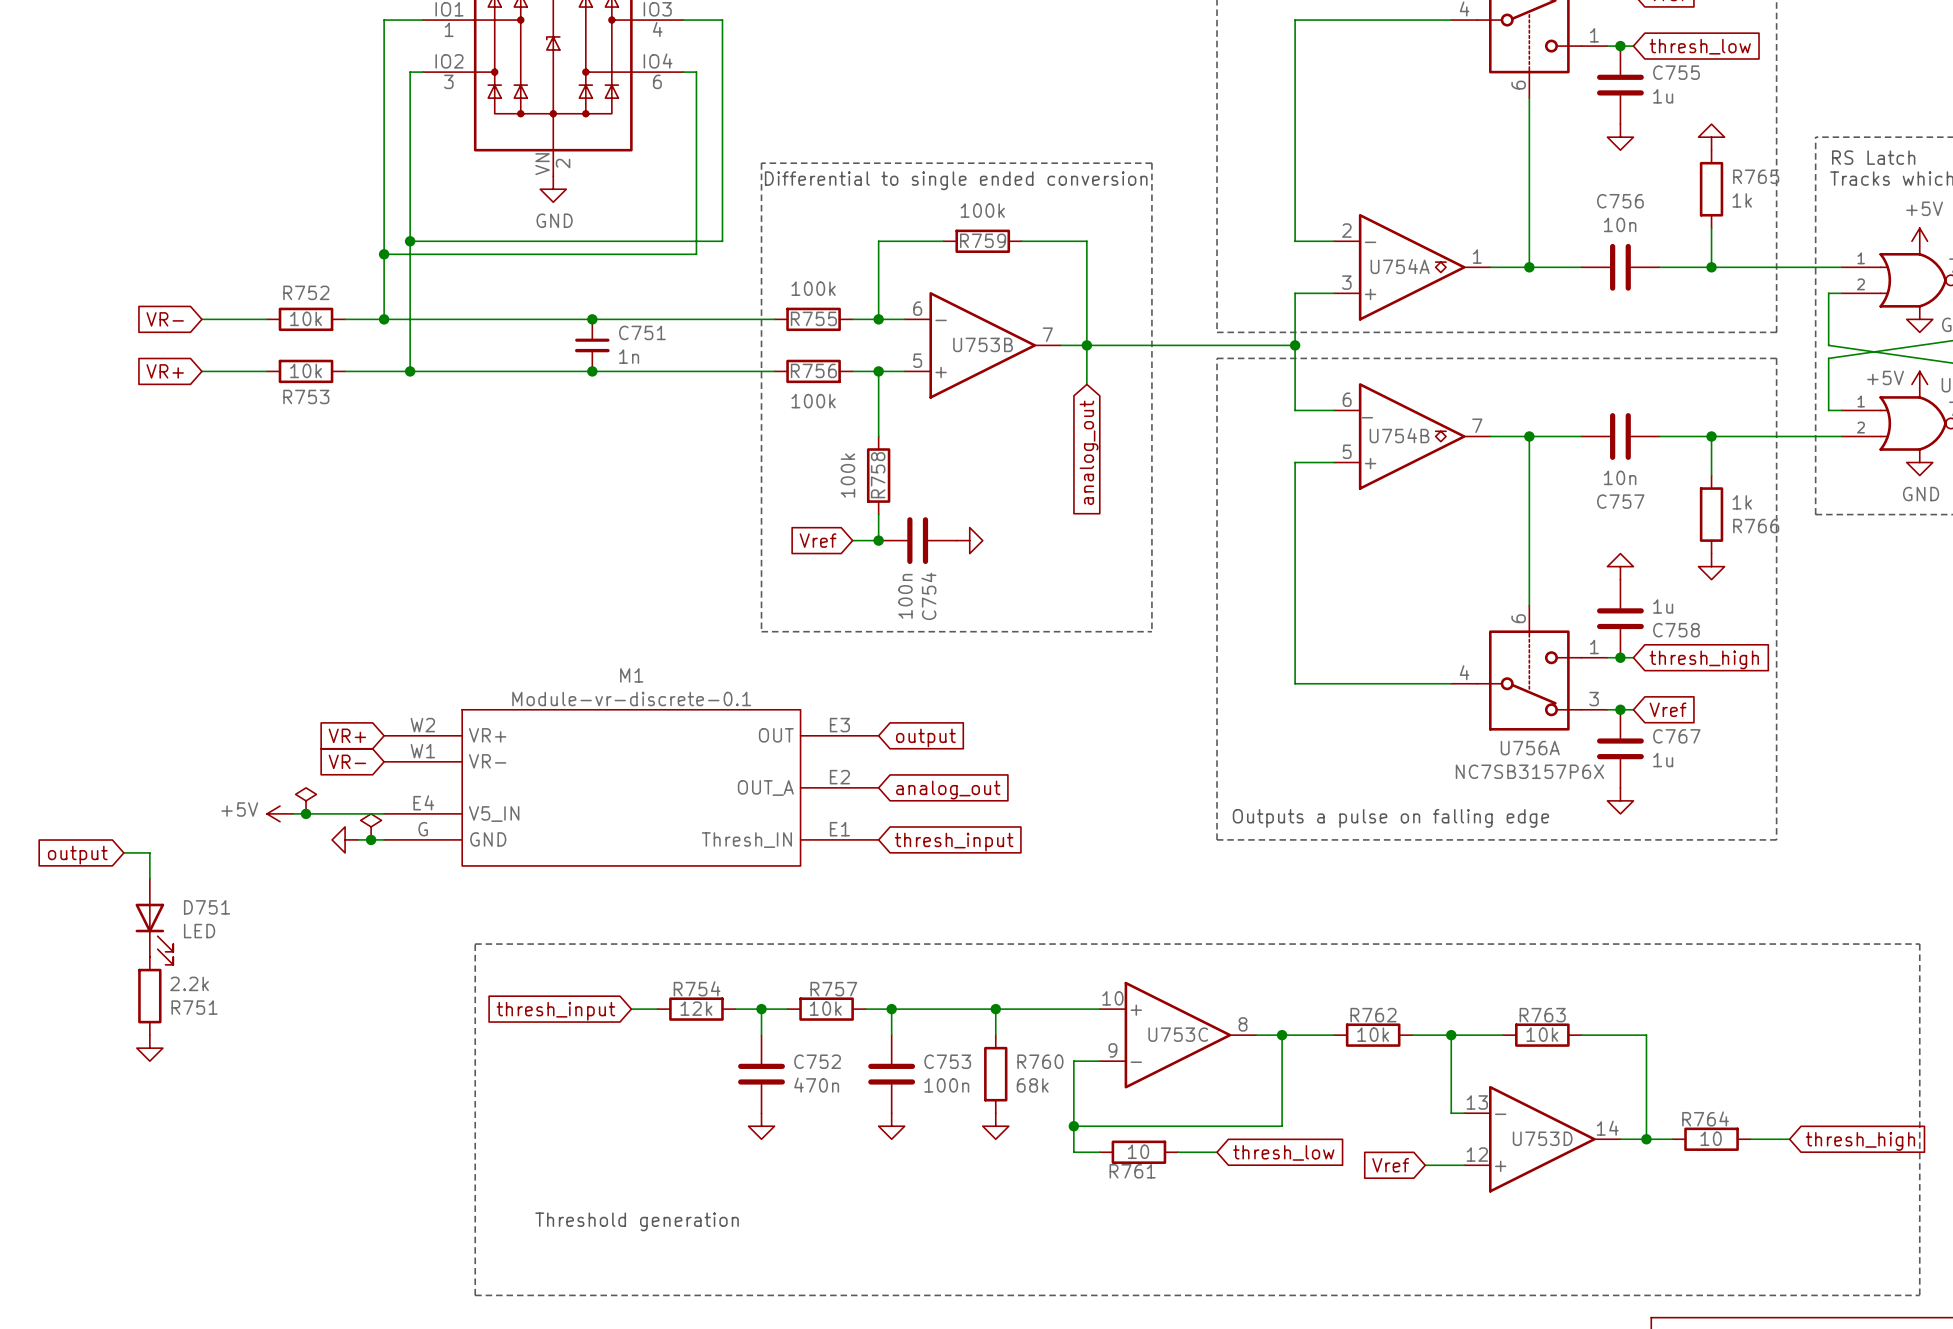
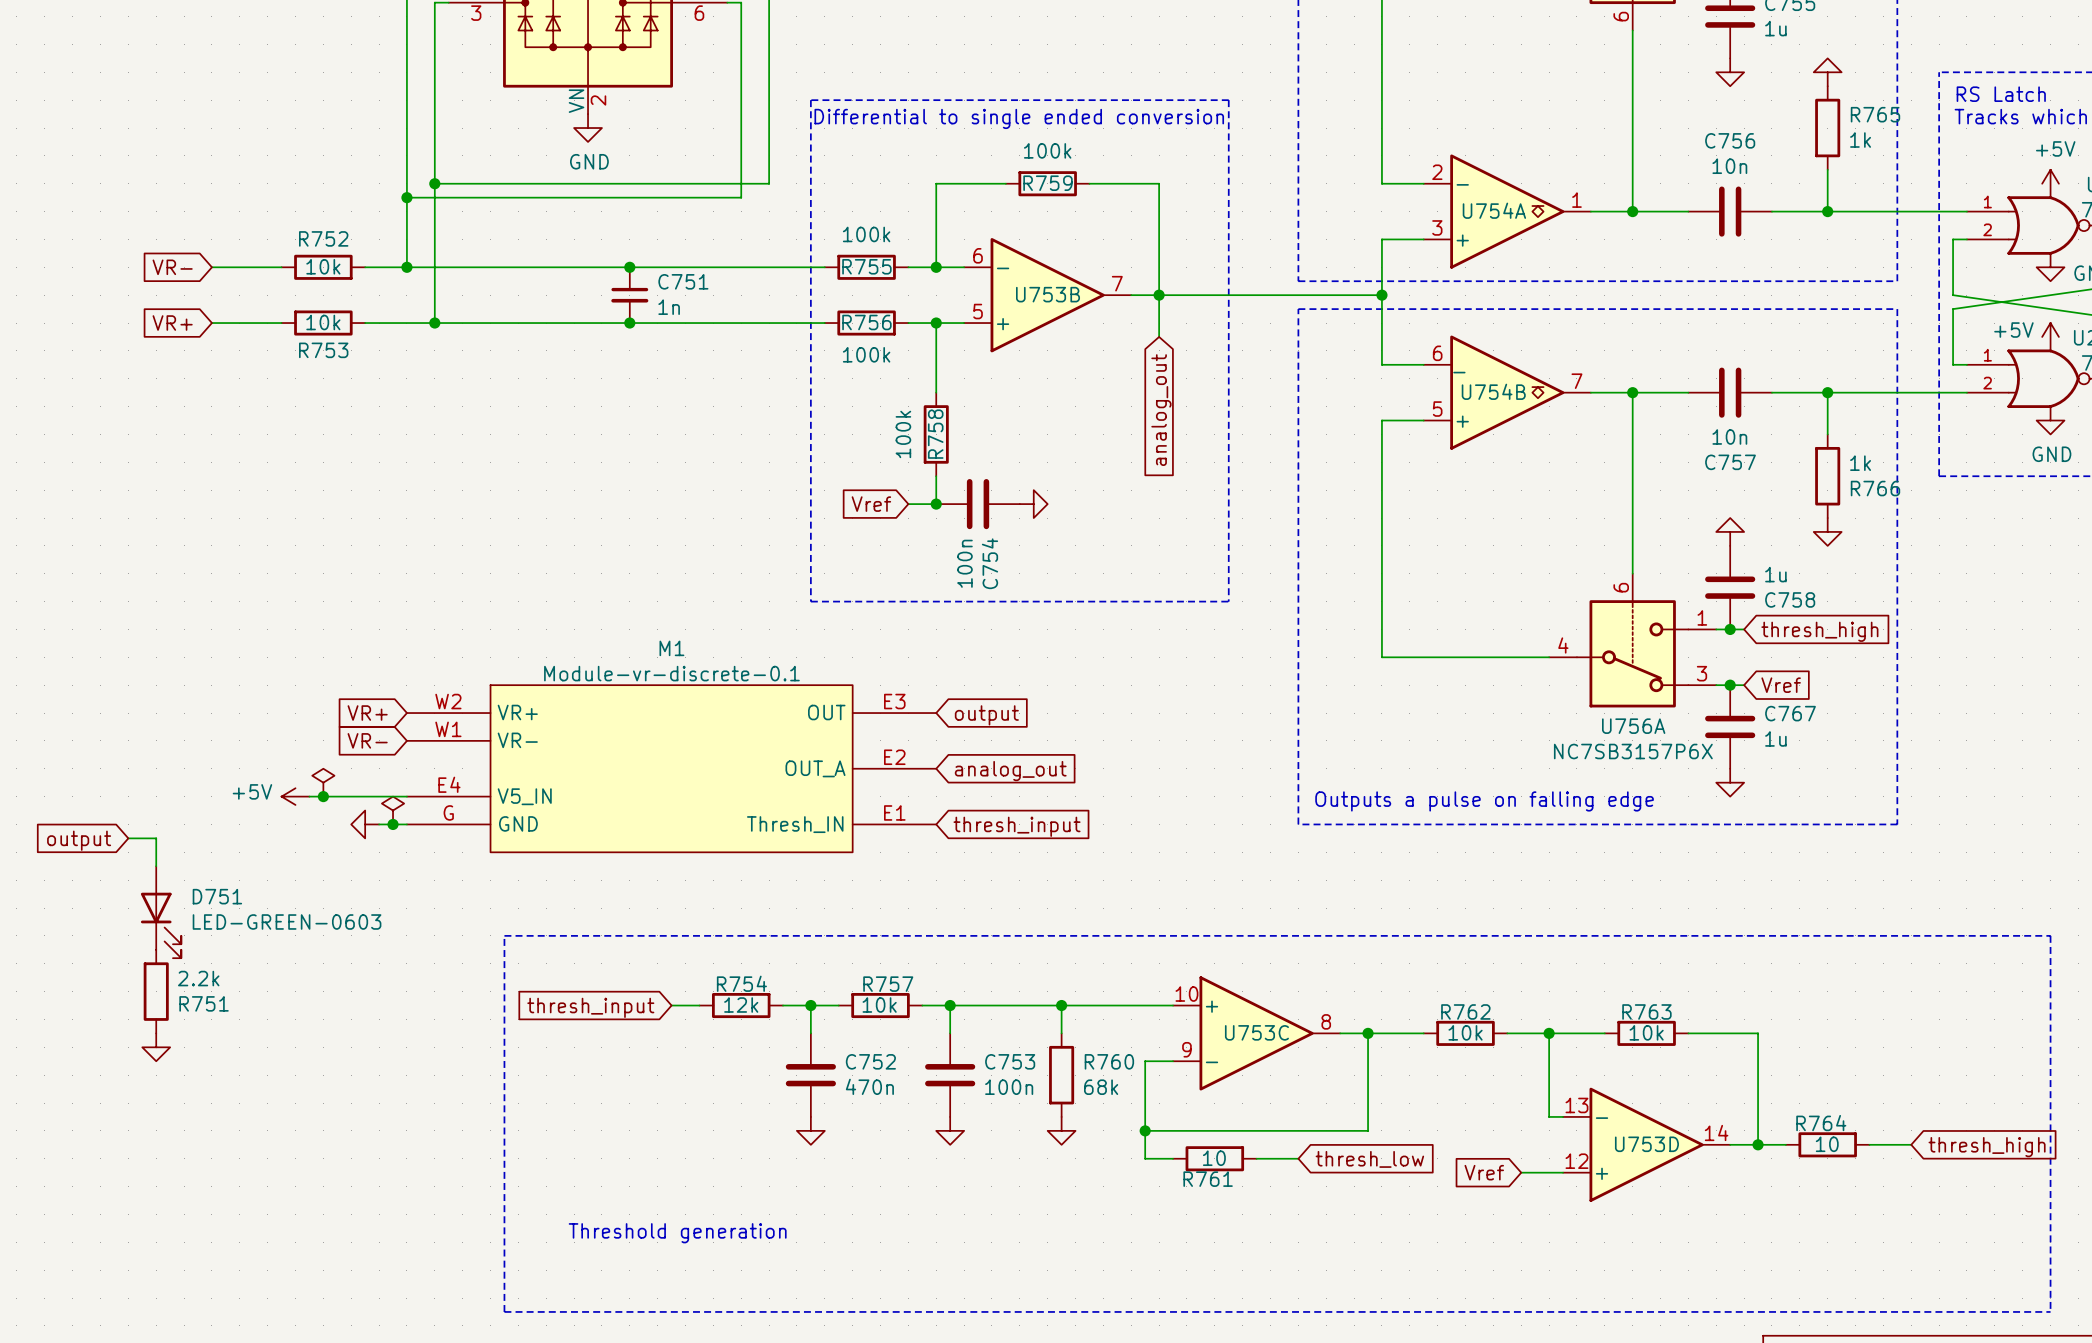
D751 value: LED (199, 931) -> LED-GREEN-0603 (287, 921)

